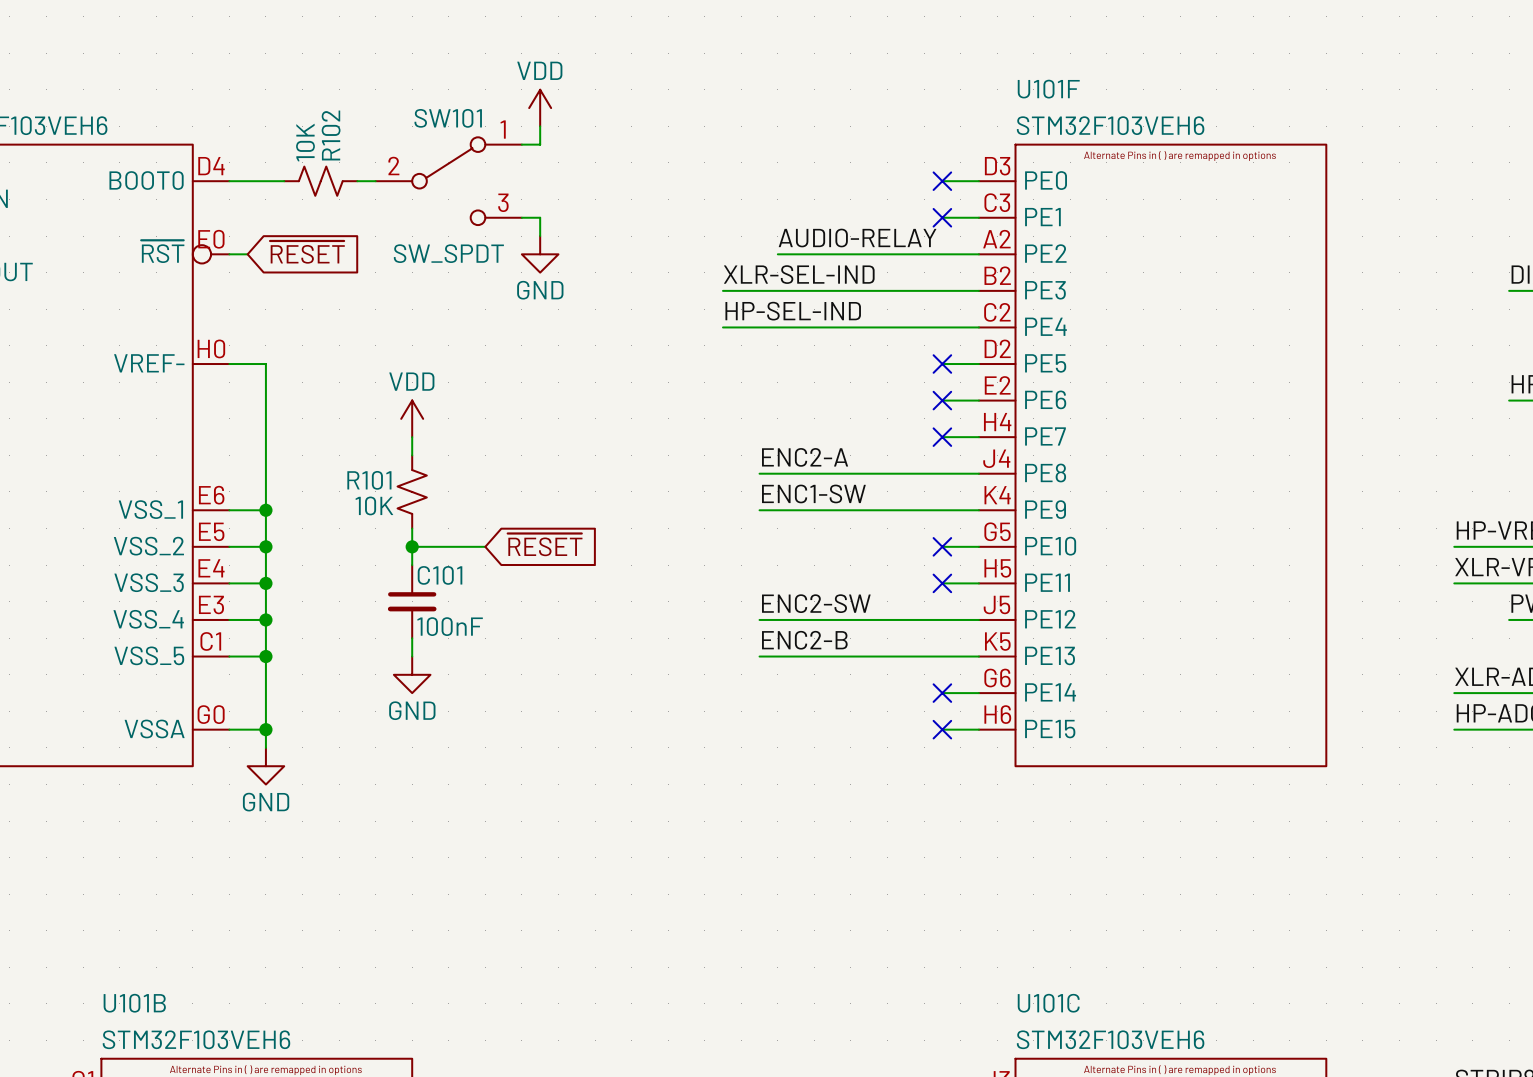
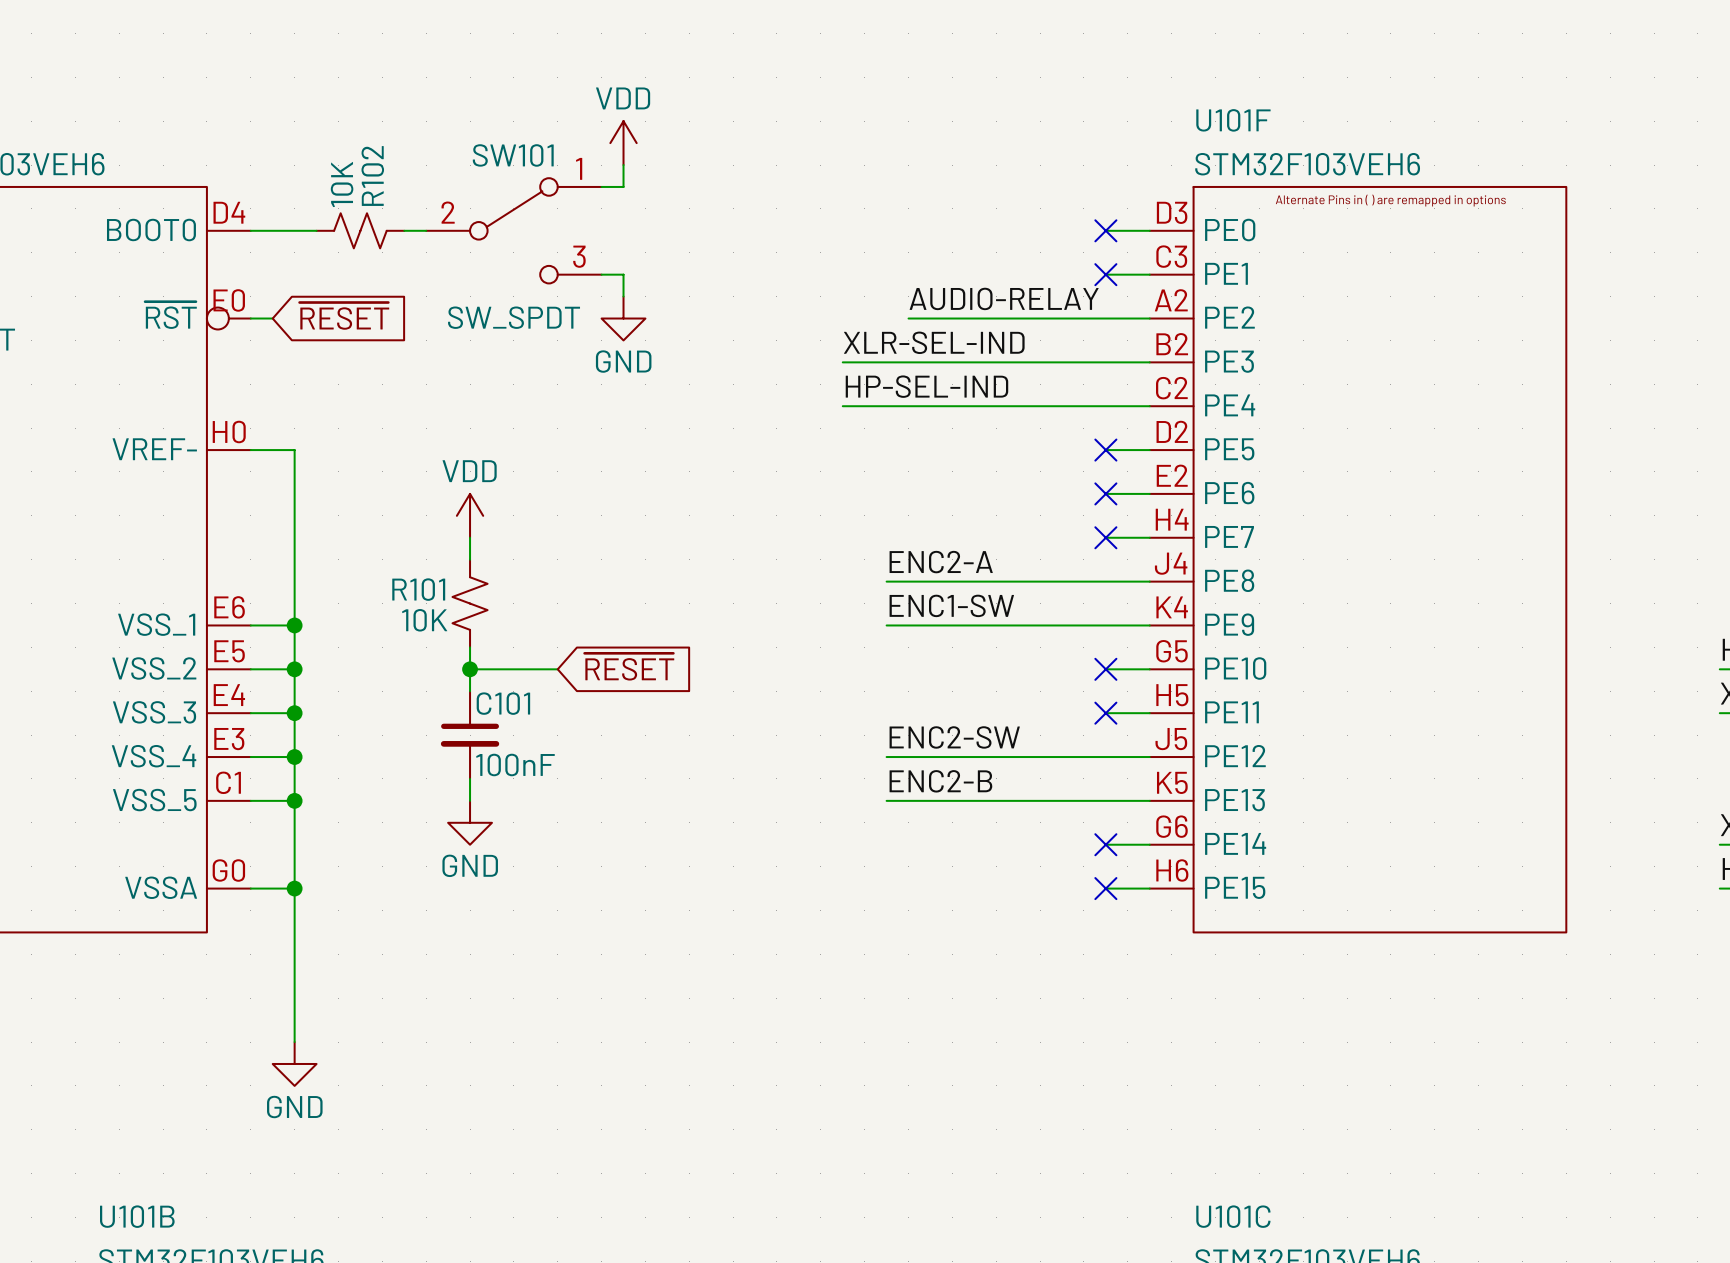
wire: none -> (294, 910) (294, 1042)
power symbol position: GND (265, 766) -> GND (294, 1063)

